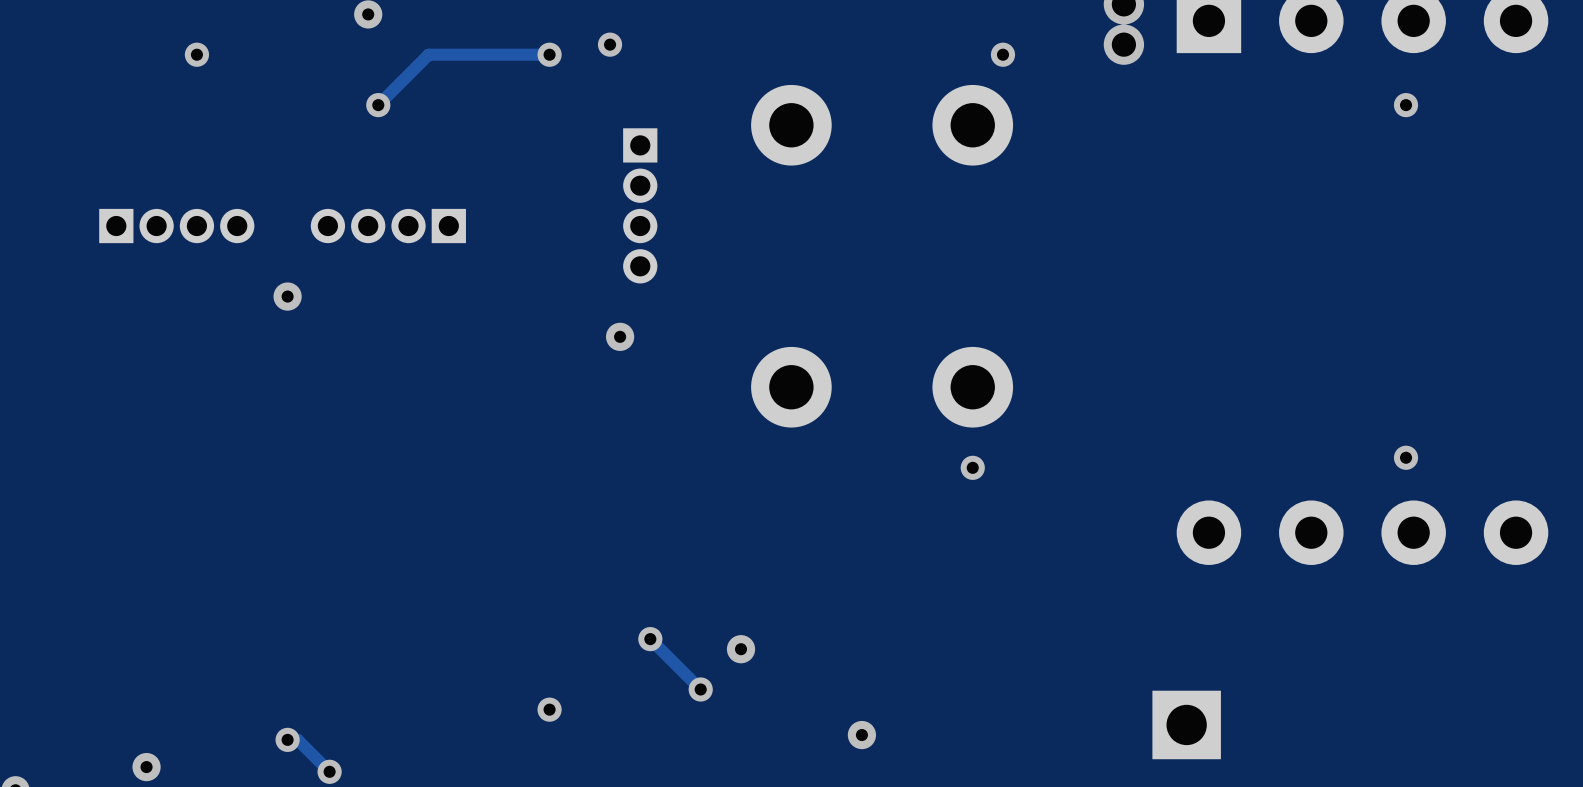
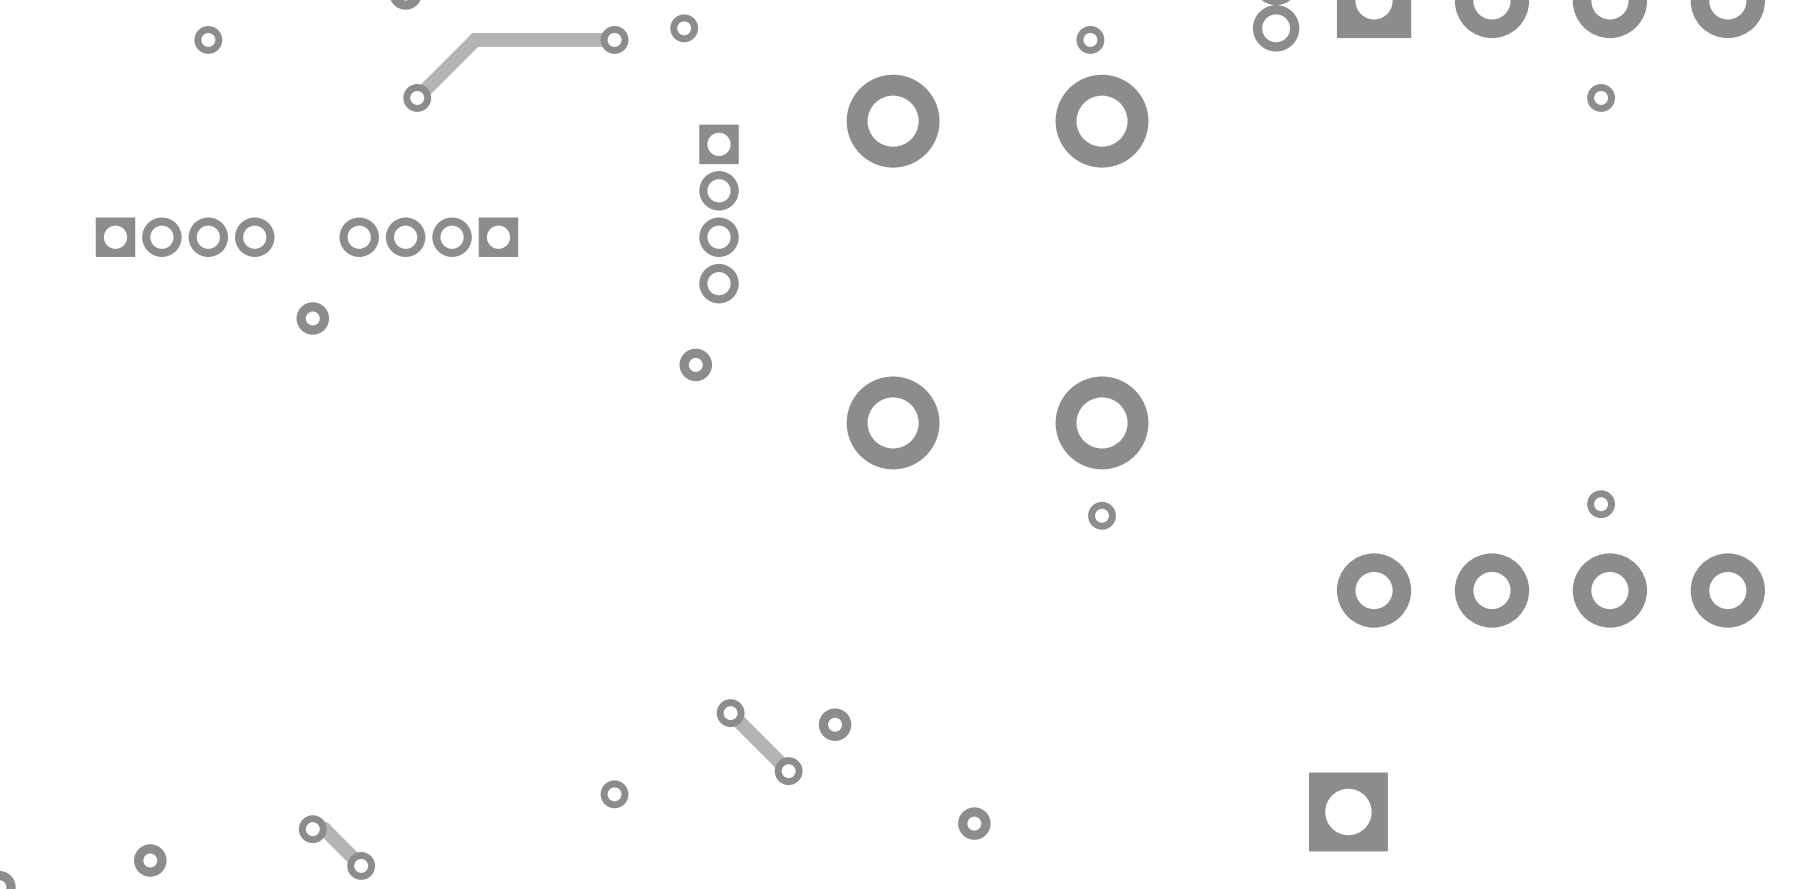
via position: (1002, 54) -> (1090, 39)

